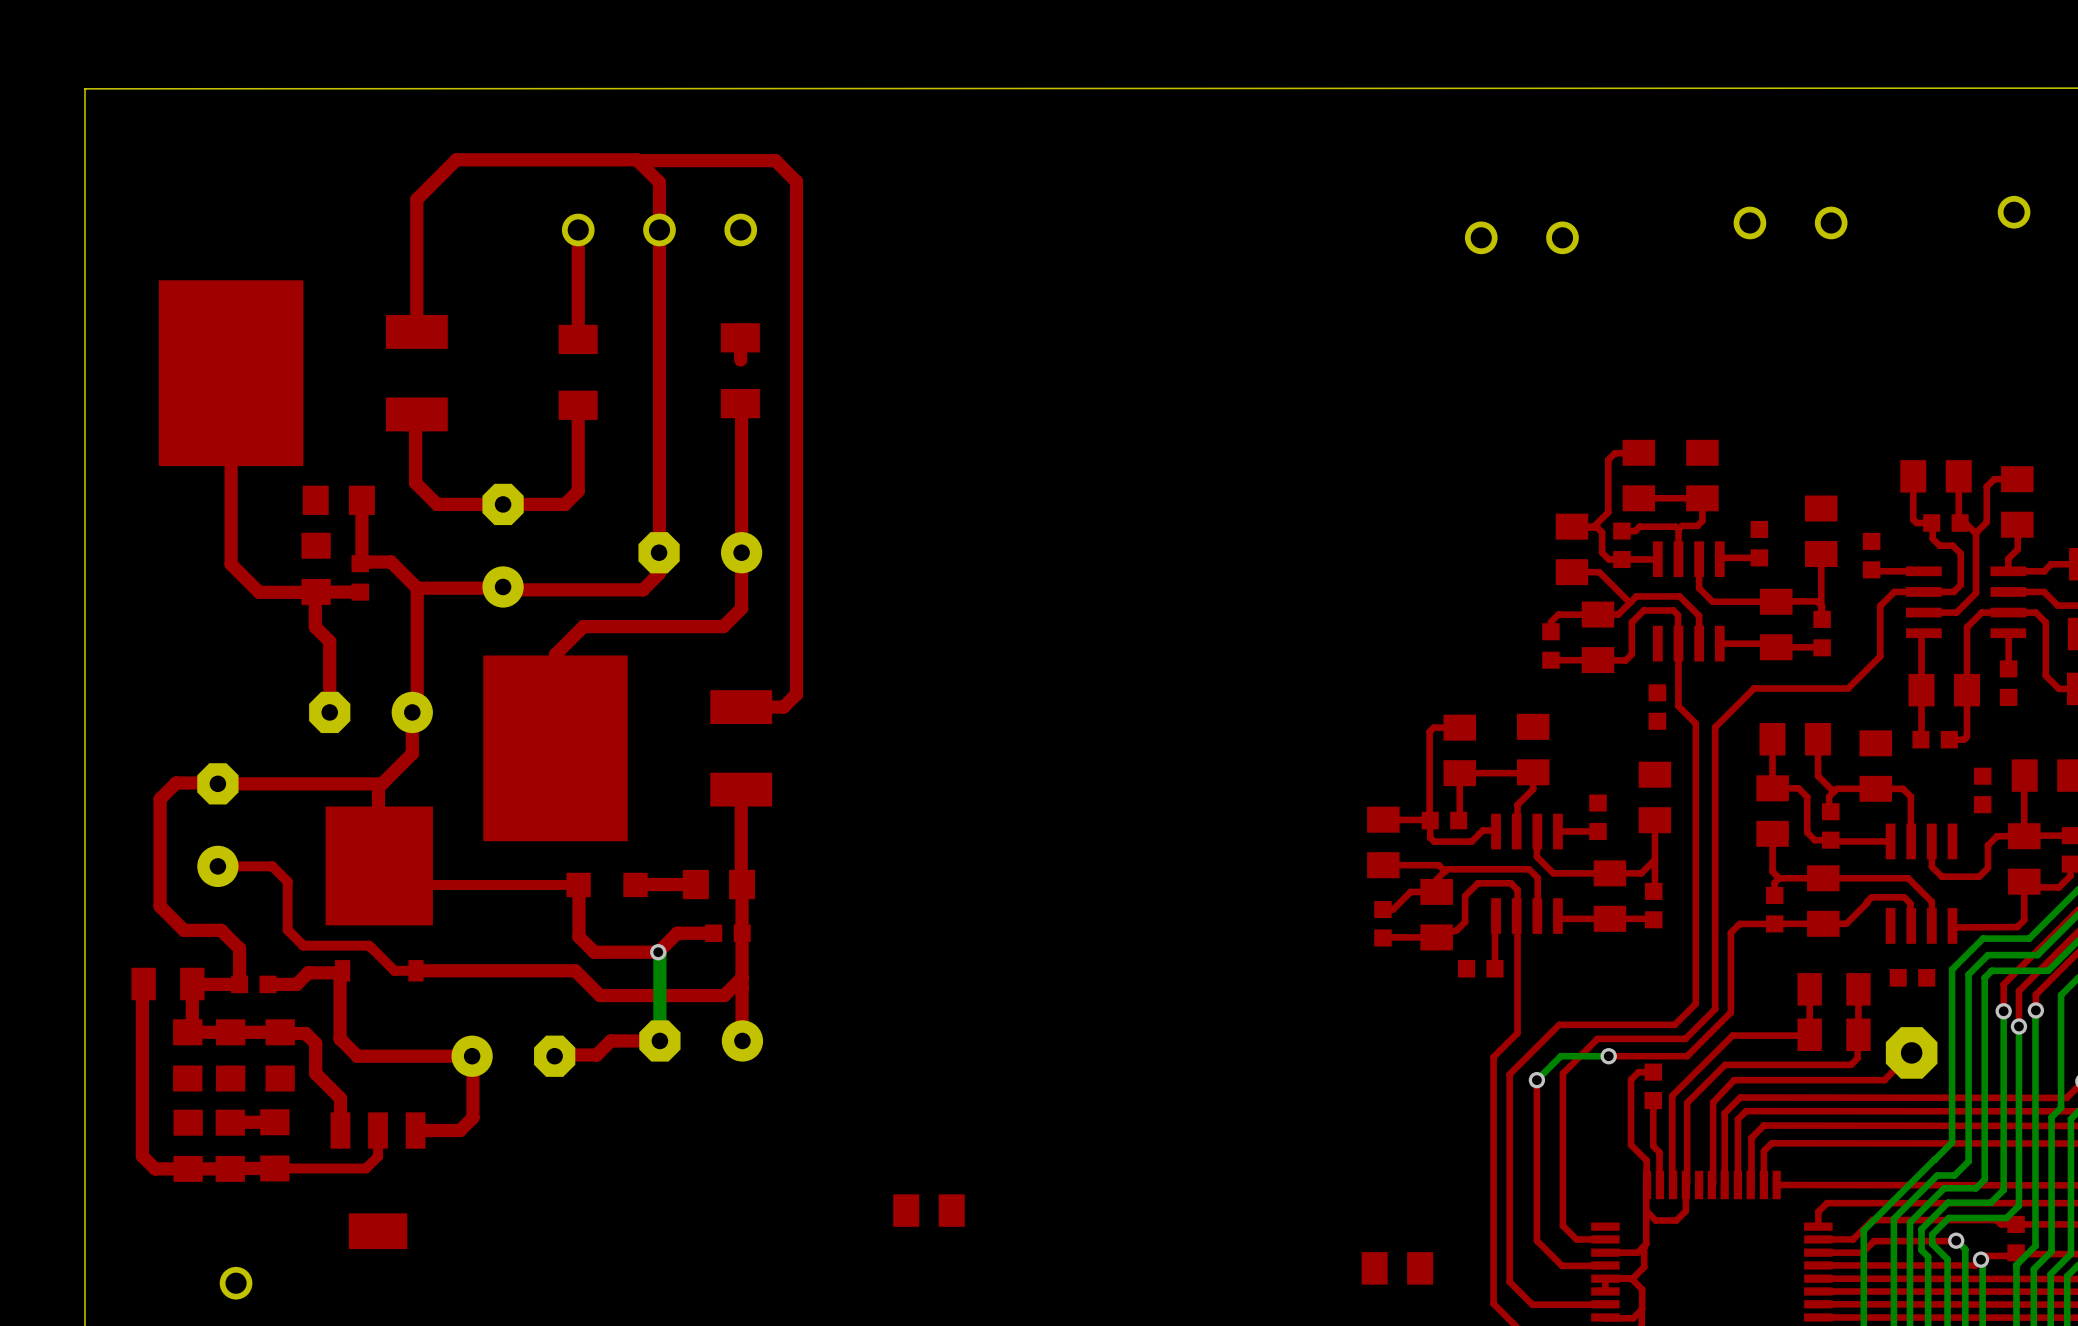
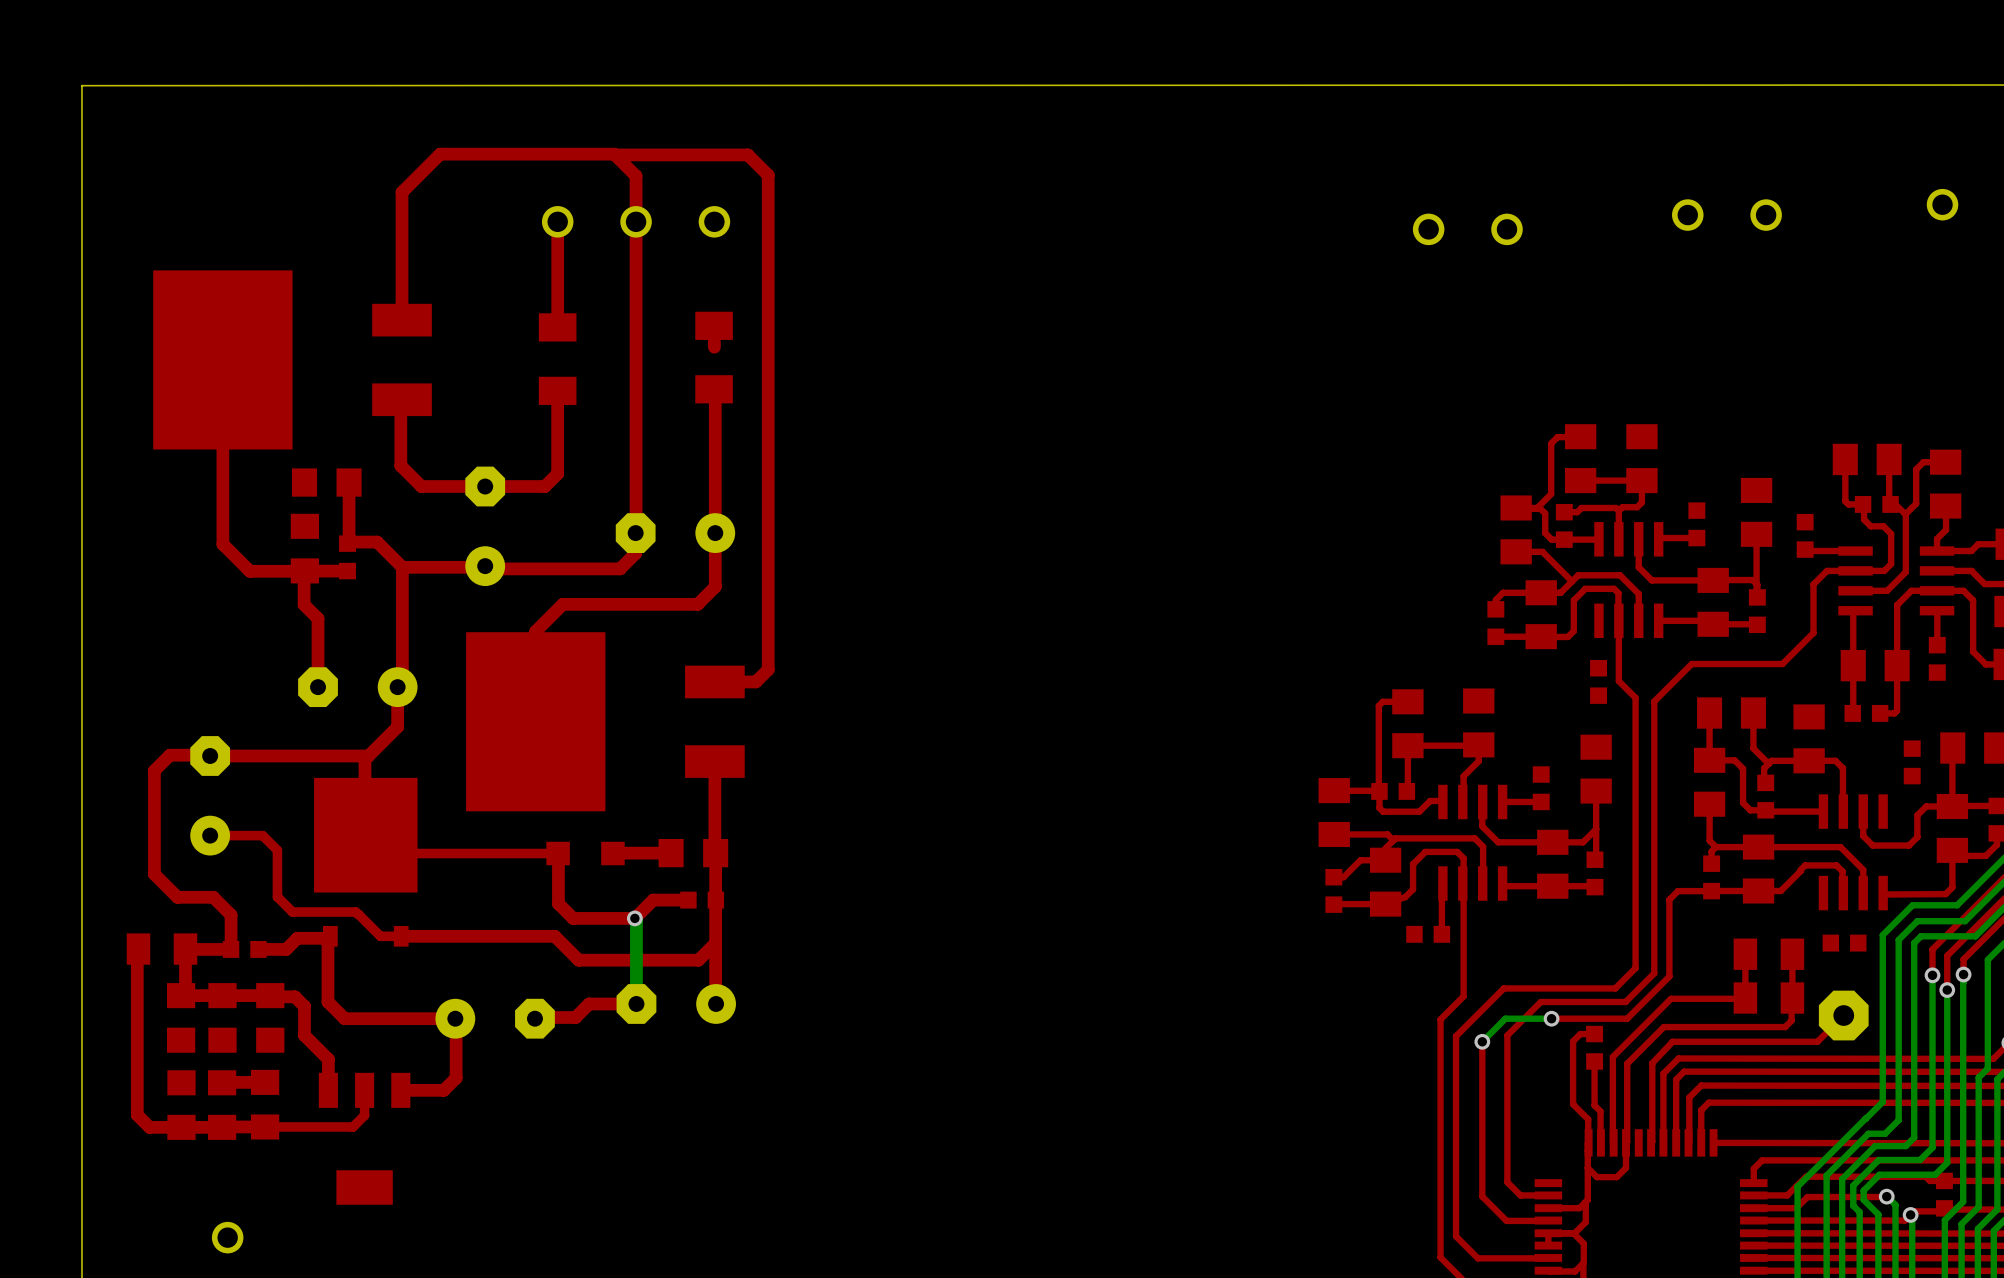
part: (928, 1210) -> none
part: (1397, 1268) -> none

